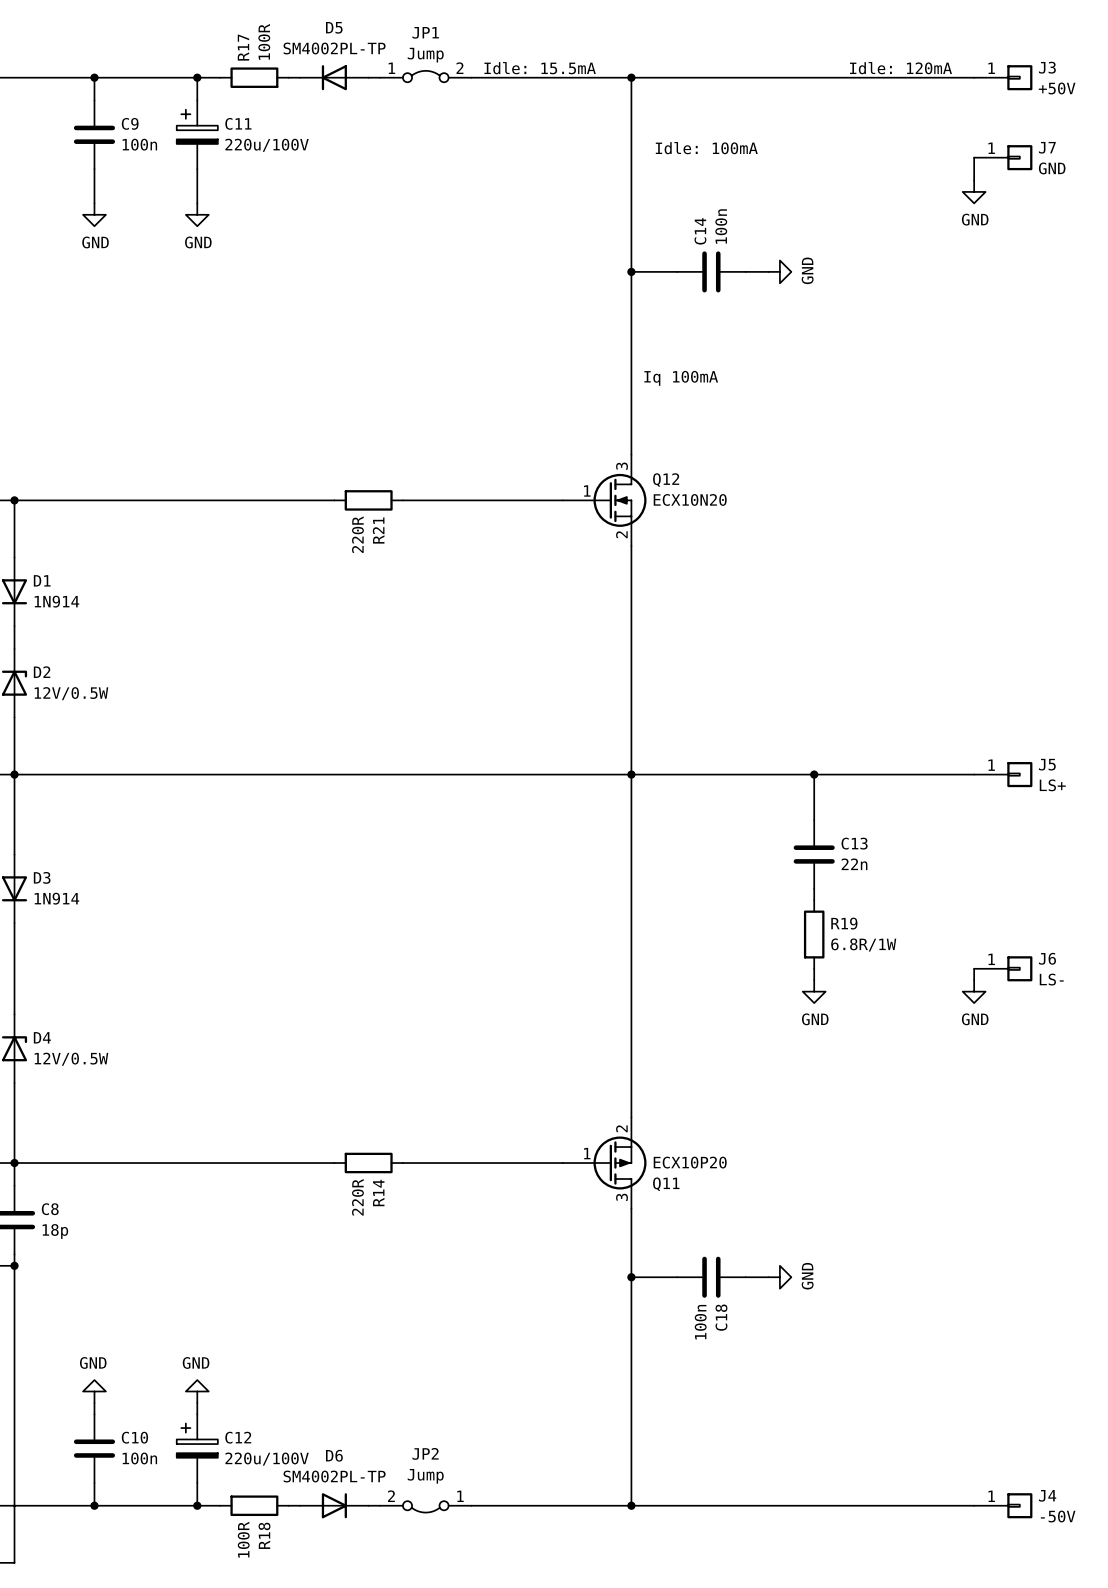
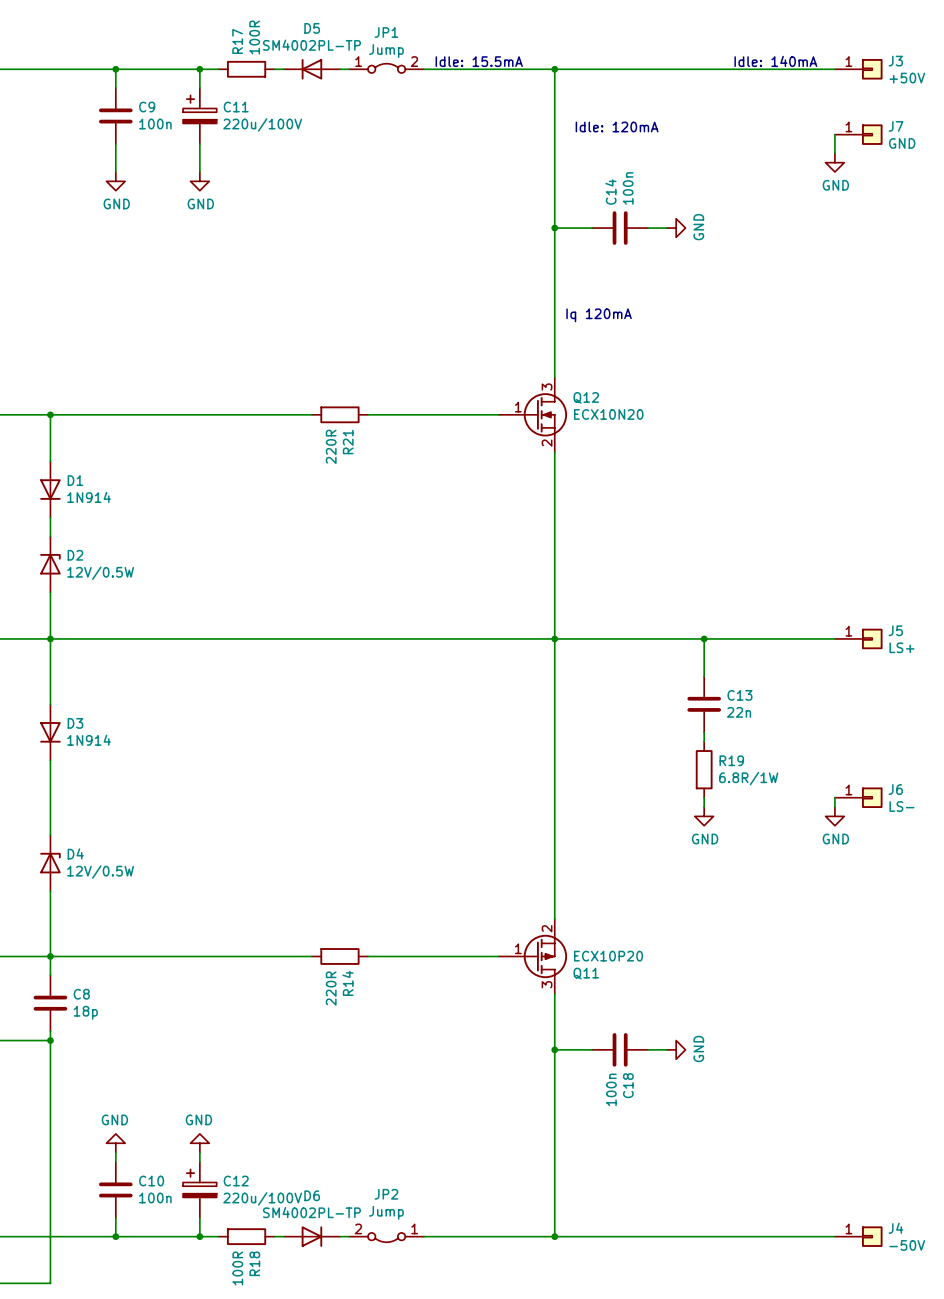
text: Idle: 120mA (900, 68) -> Idle: 140mA (775, 61)
text: Idle: 100mA (706, 148) -> Idle: 120mA (617, 127)
text: Iq 100mA (681, 378) -> Iq 120mA (599, 315)

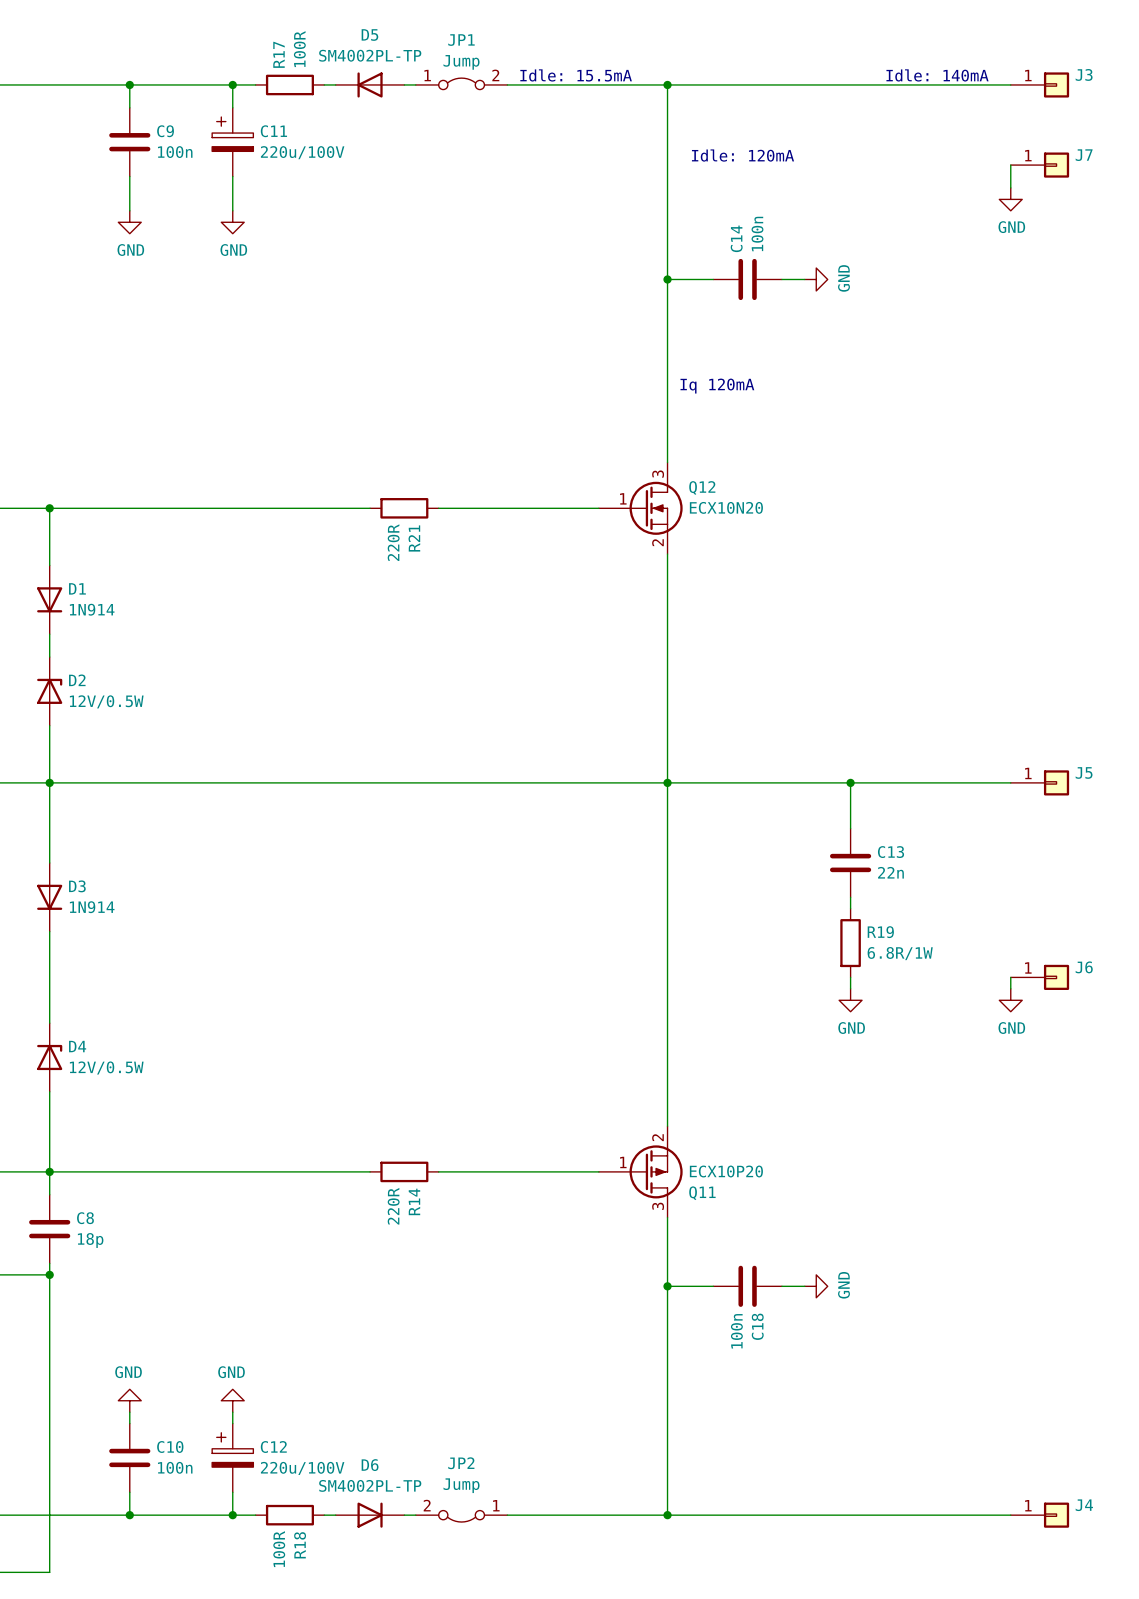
J3 value: +50V (907, 78) -> none
J7 value: GND (902, 143) -> none
J5 value: LS+ (901, 647) -> none
J6 value: LS- (901, 806) -> none
J4 value: -50V (907, 1245) -> none

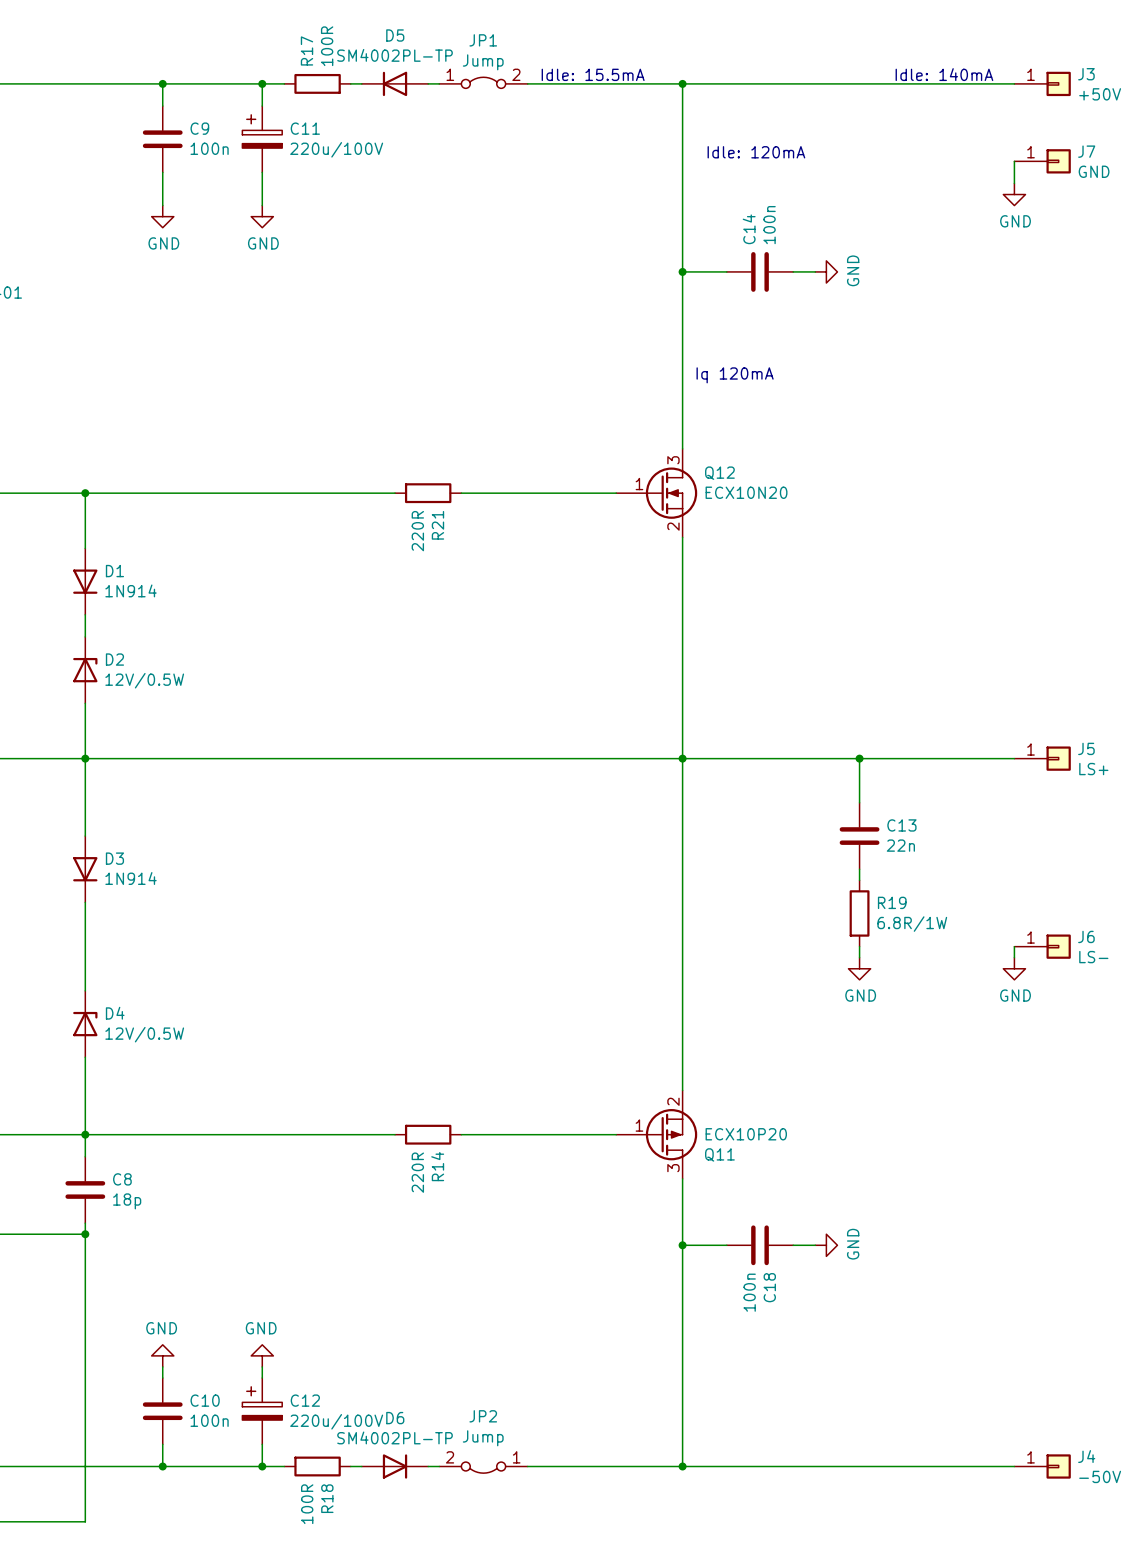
J3 value: none -> +50V (1100, 94)
J7 value: none -> GND (1094, 171)
J5 value: none -> LS+ (1093, 769)
J6 value: none -> LS- (1093, 957)
J4 value: none -> -50V (1100, 1476)

